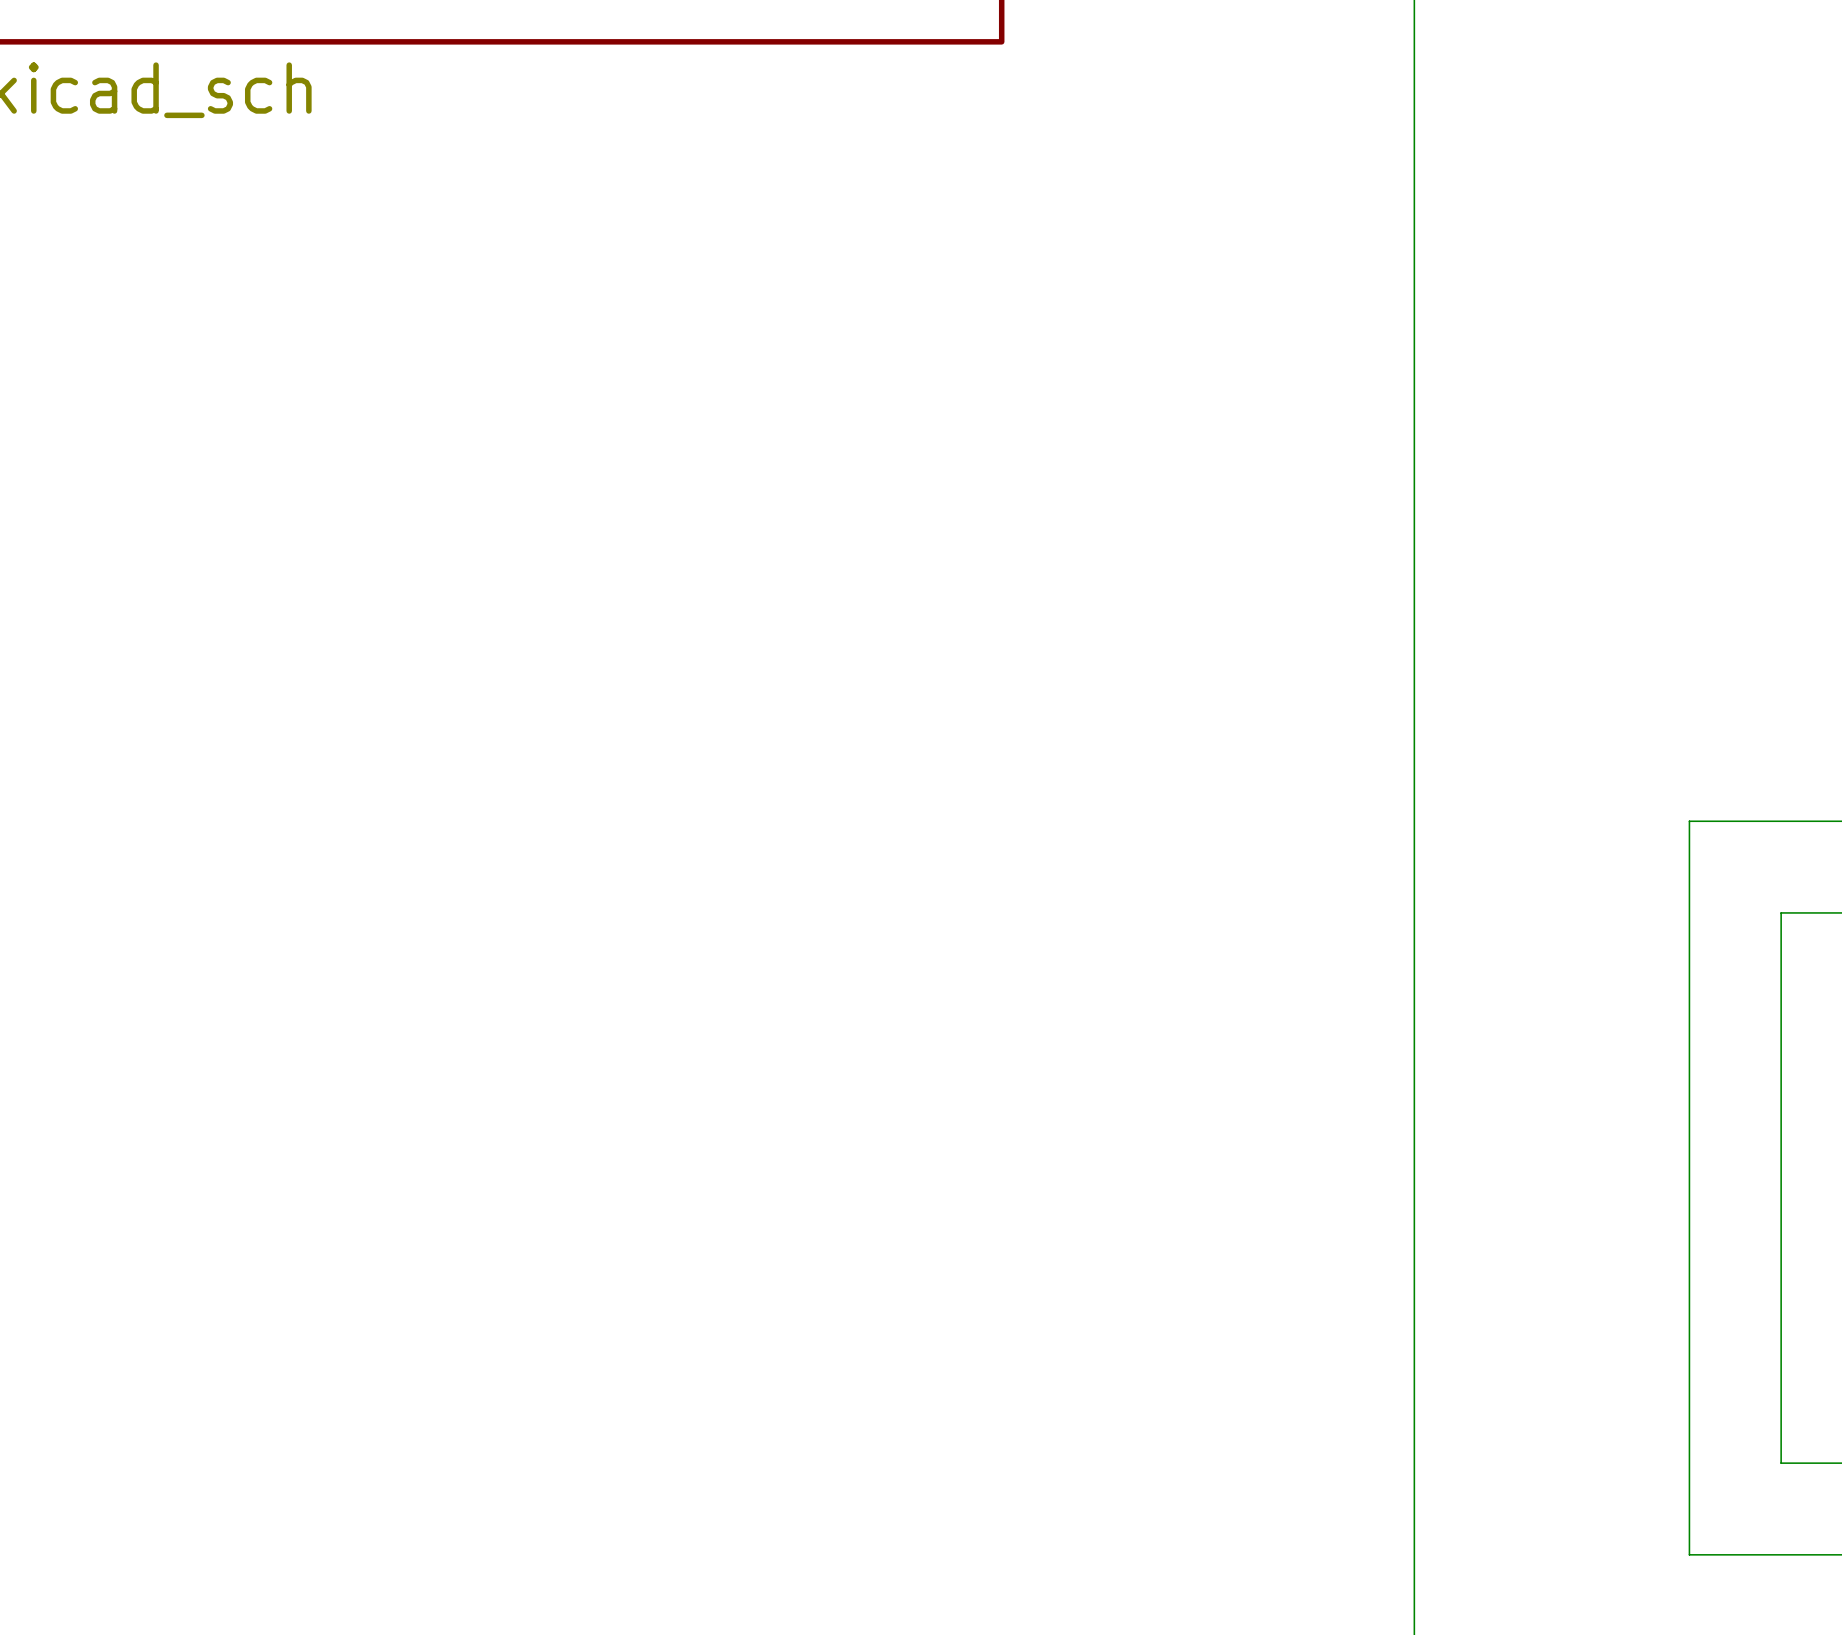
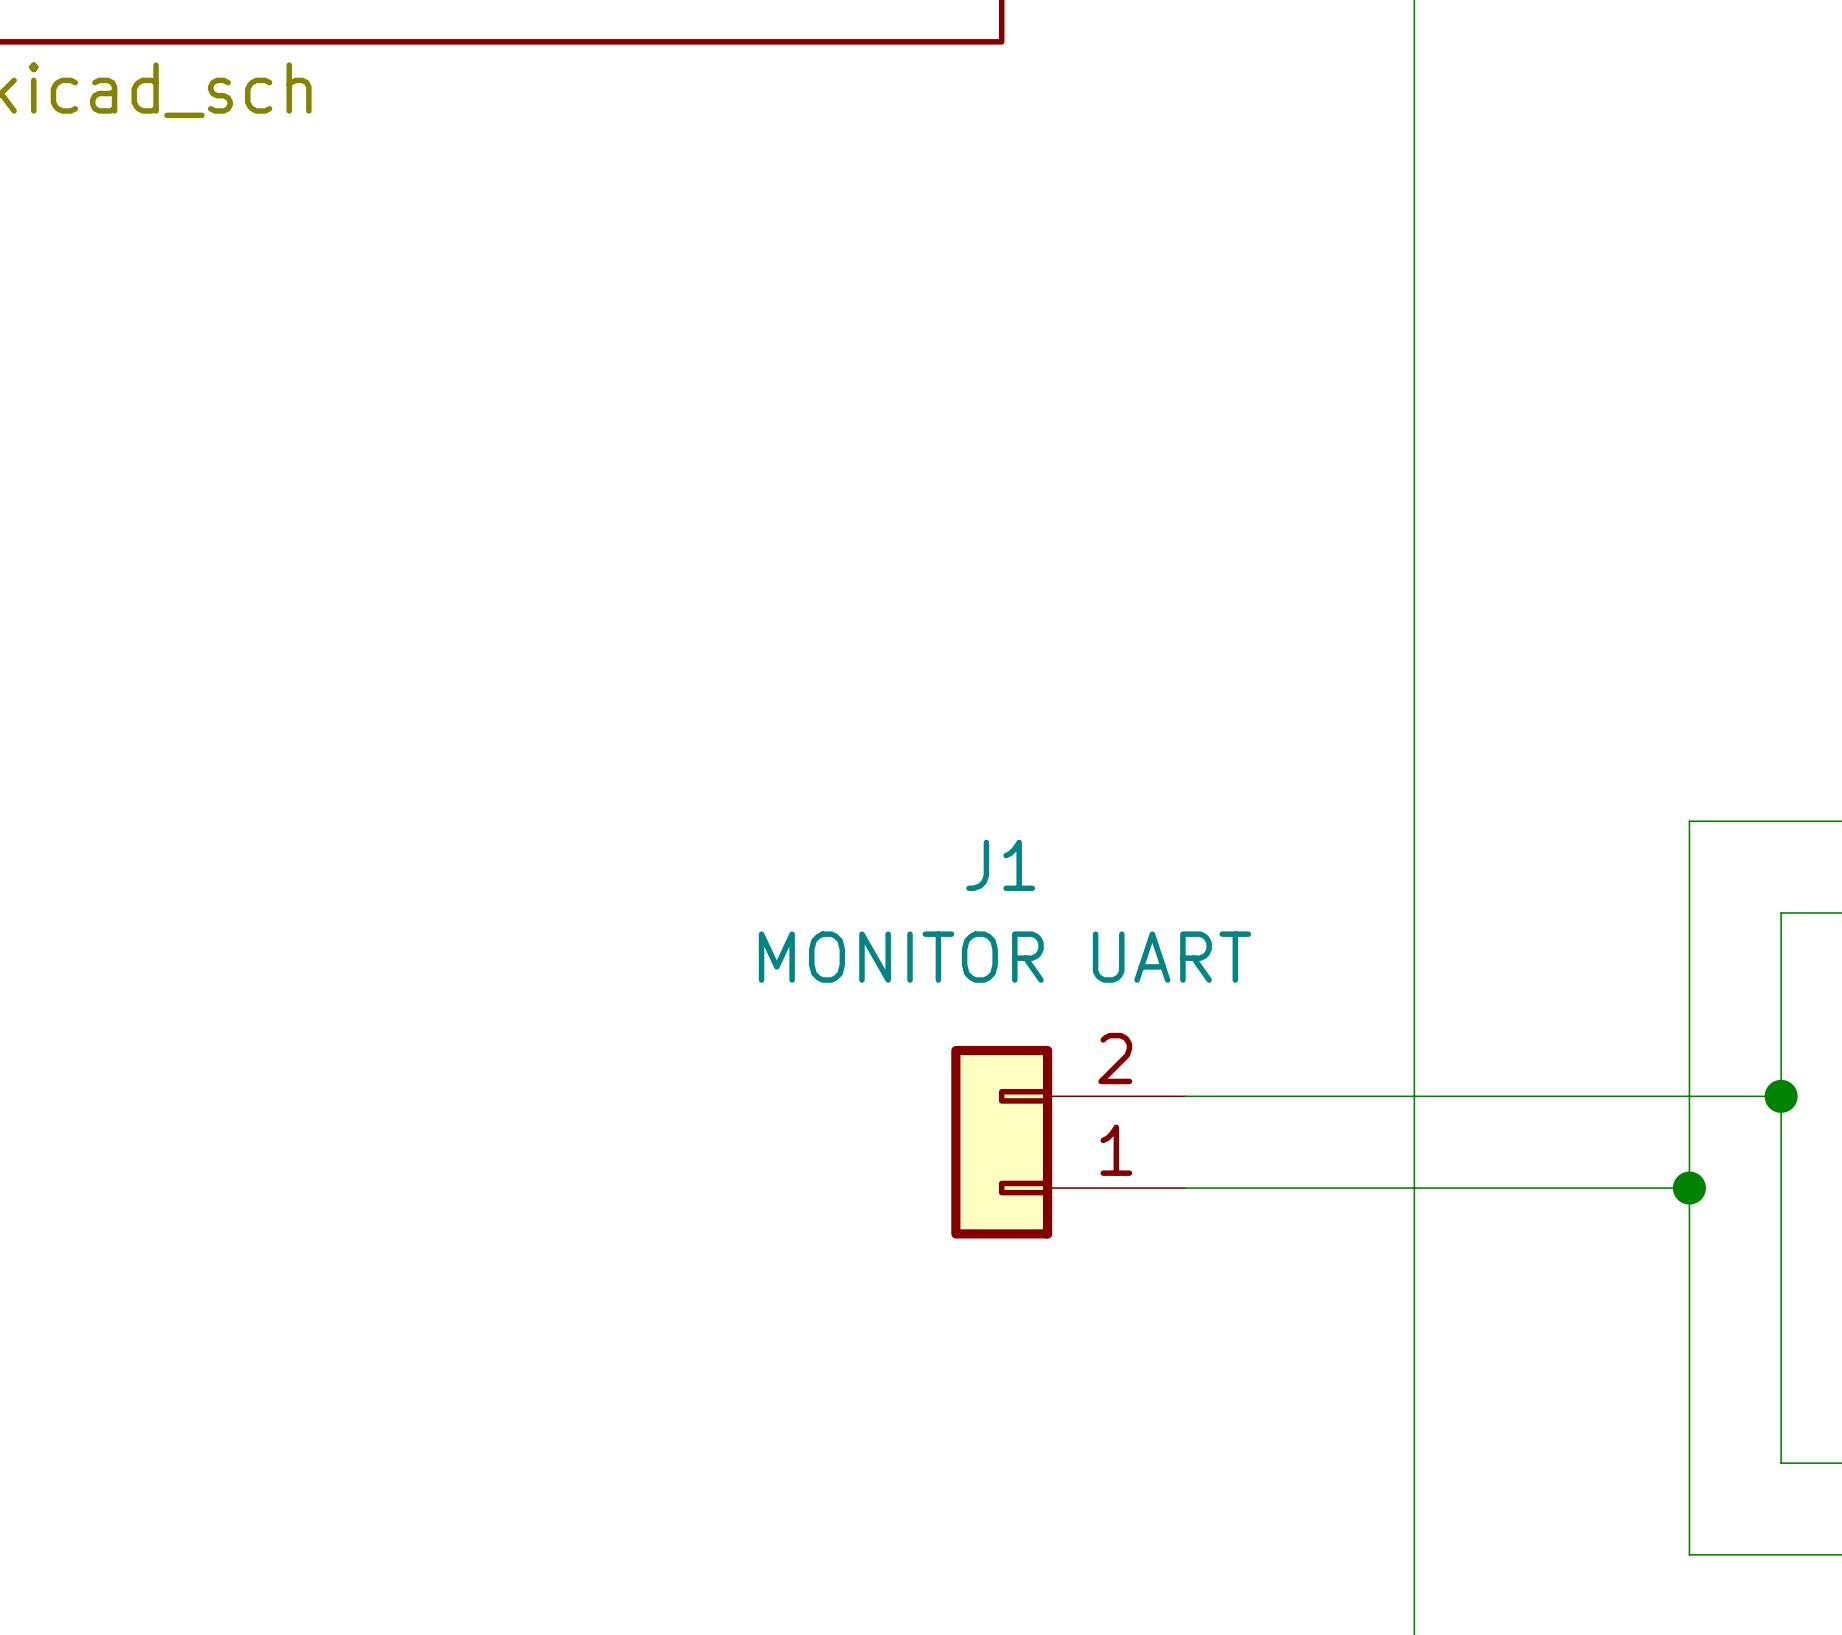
wire: none -> (1185, 1096) (1781, 1096)
junction: none -> (1781, 1096)
J1: none -> MONITOR UART (1068, 1142)
wire: none -> (1185, 1188) (1689, 1188)
junction: none -> (1689, 1188)

